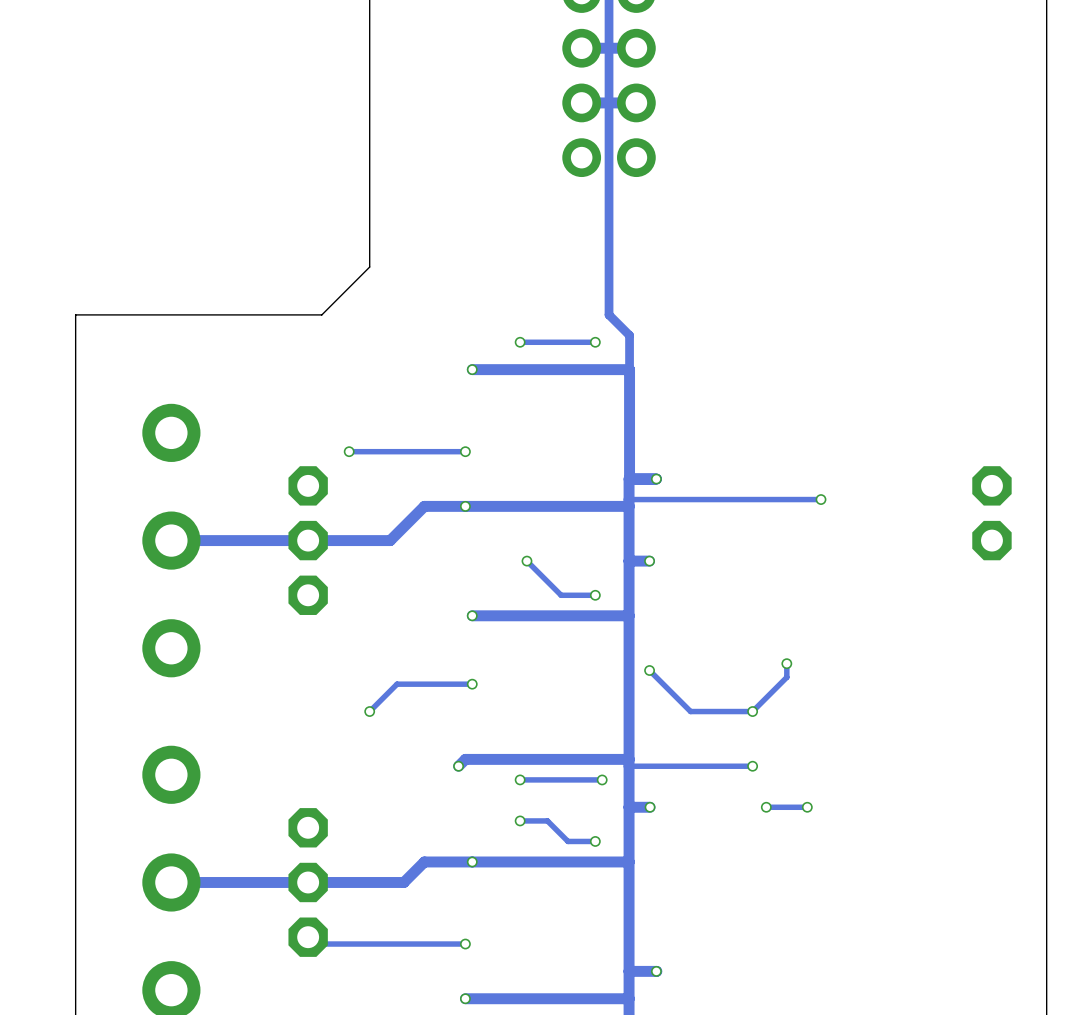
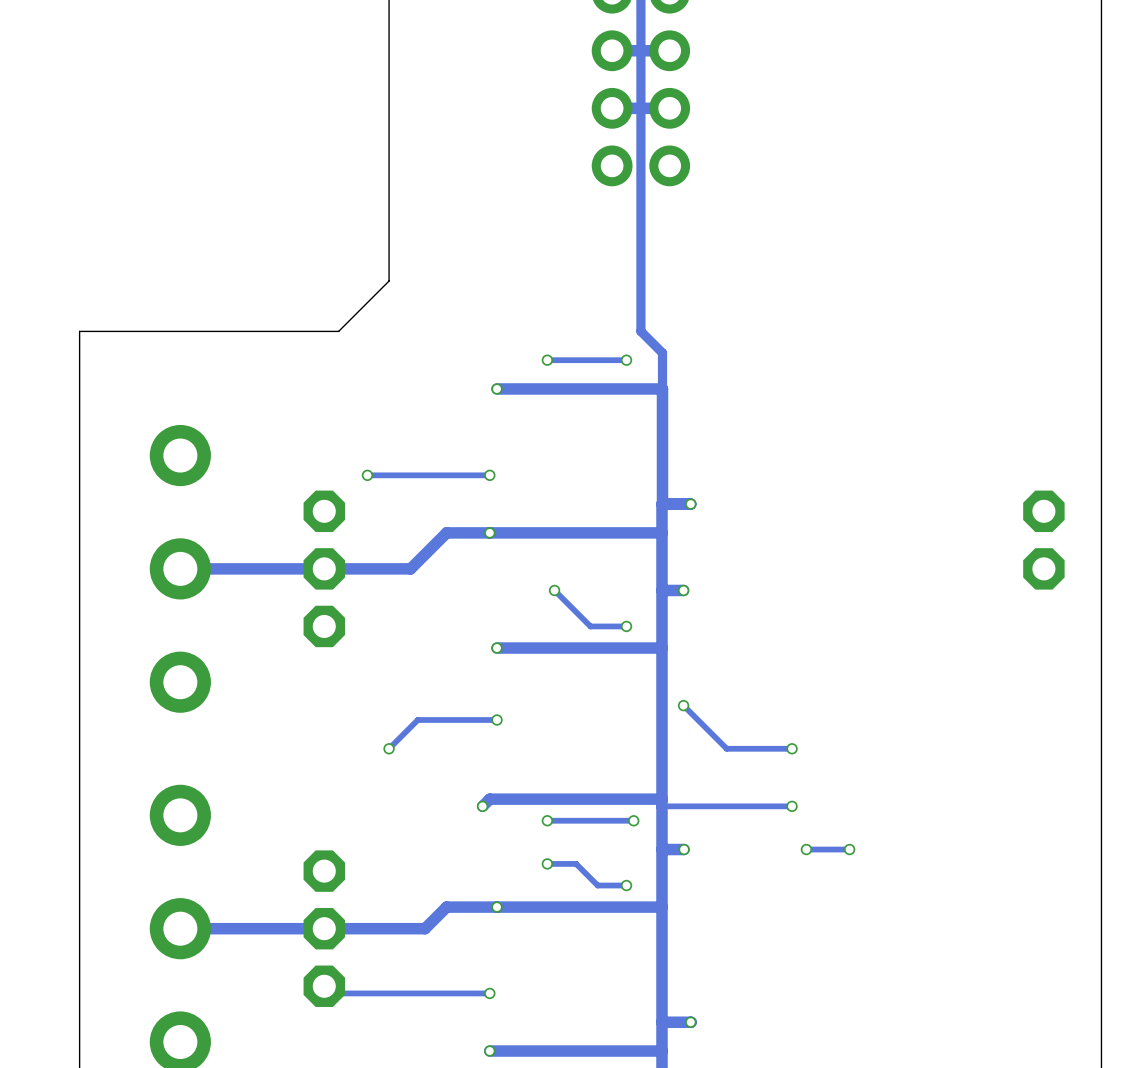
track: (821, 499) (629, 499) -> none
via: (821, 499) -> none
track: (786, 663) (786, 677) (752, 711) -> none
via: (786, 663) -> none

